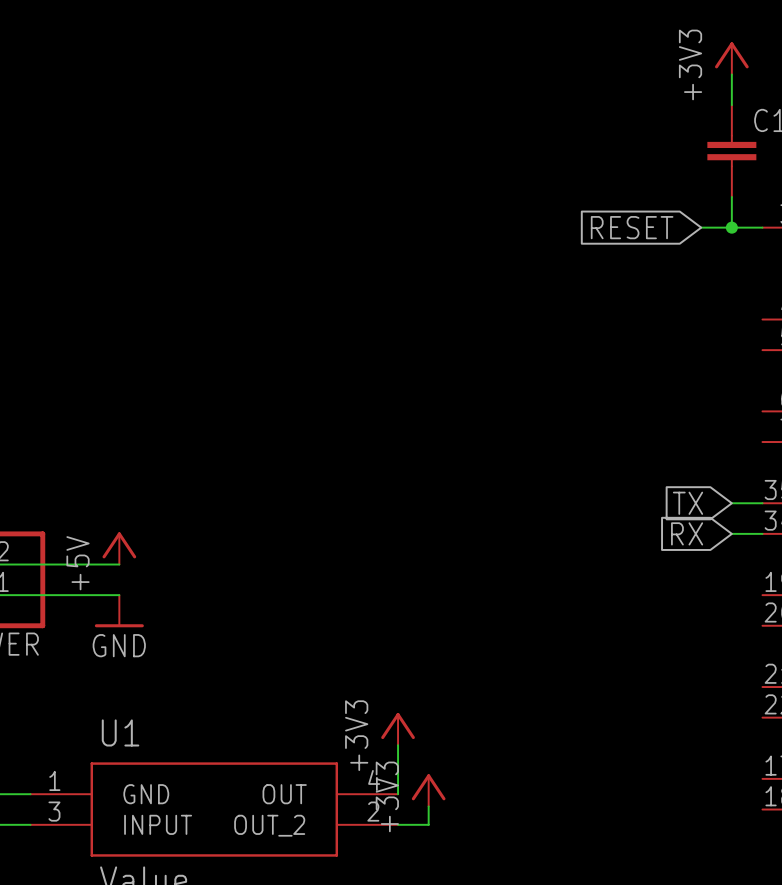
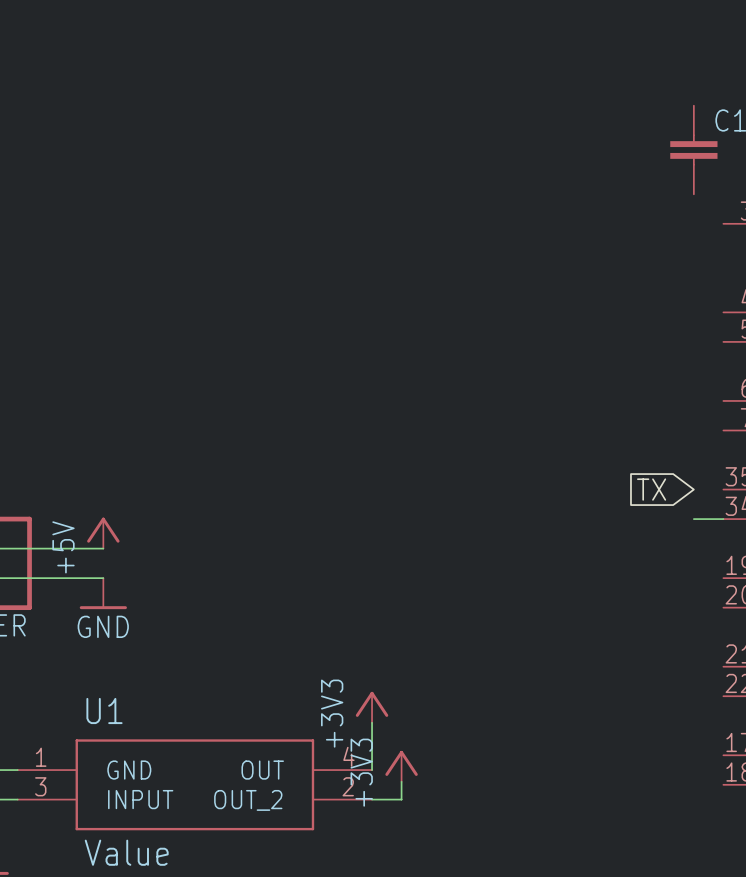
power symbol: +3V3 (731, 58) -> none
wire: (731, 74) (731, 105) -> none
wire: (731, 197) (731, 227) -> none
global label: RESET (632, 227) -> none
wire: (701, 227) (762, 227) -> none
junction: (731, 227) -> none
wire: (731, 503) (762, 503) -> none
global label: RX (687, 533) -> none

